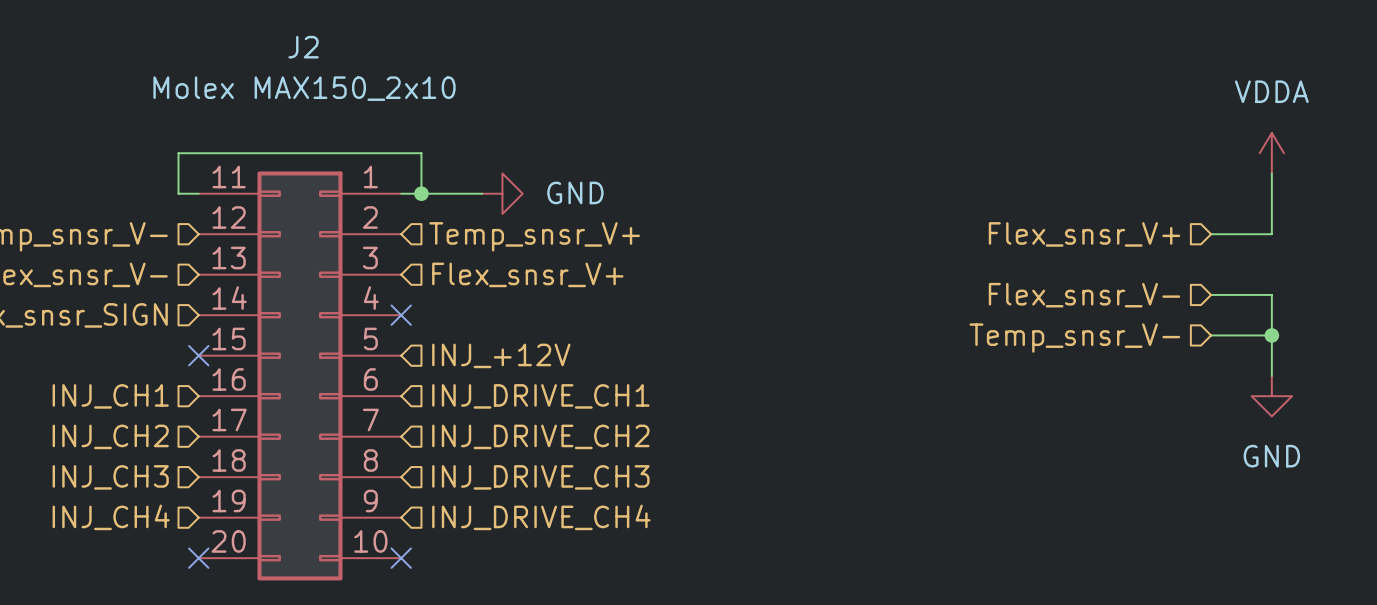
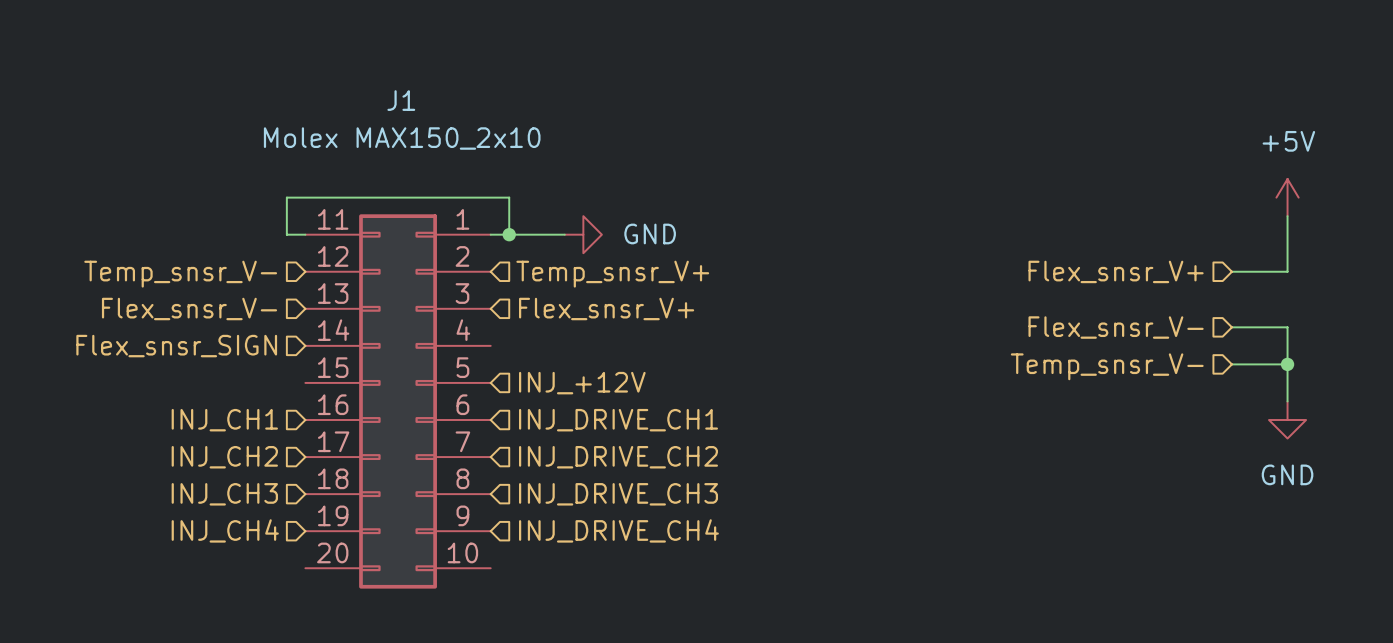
J2 name: J2 (303, 47) -> J1 (401, 100)
power symbol: VDDA (1271, 153) -> +5V (1287, 197)
no-connect mark: (401, 315) -> none
no-connect mark: (198, 355) -> none
no-connect mark: (198, 558) -> none
no-connect mark: (401, 558) -> none

